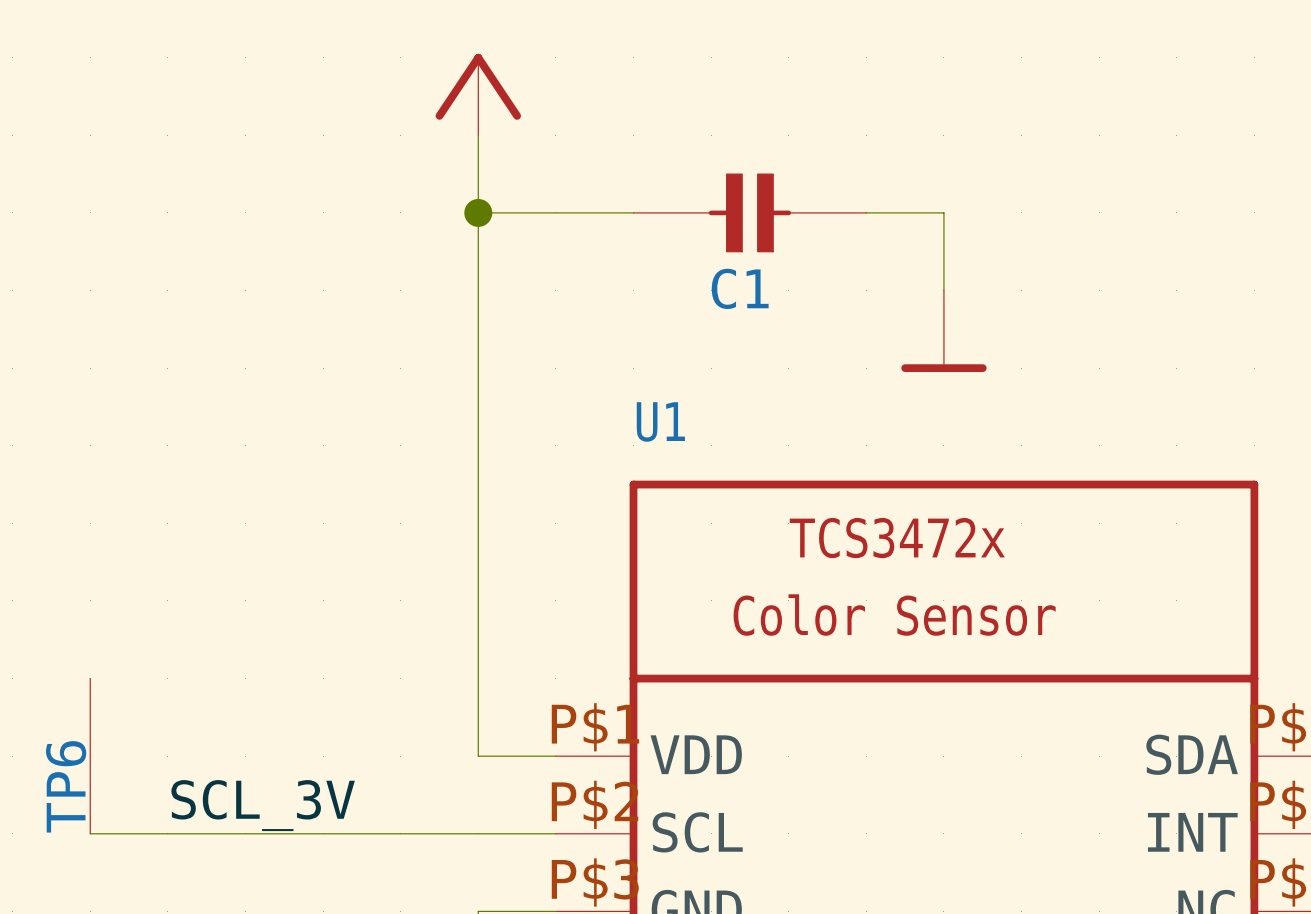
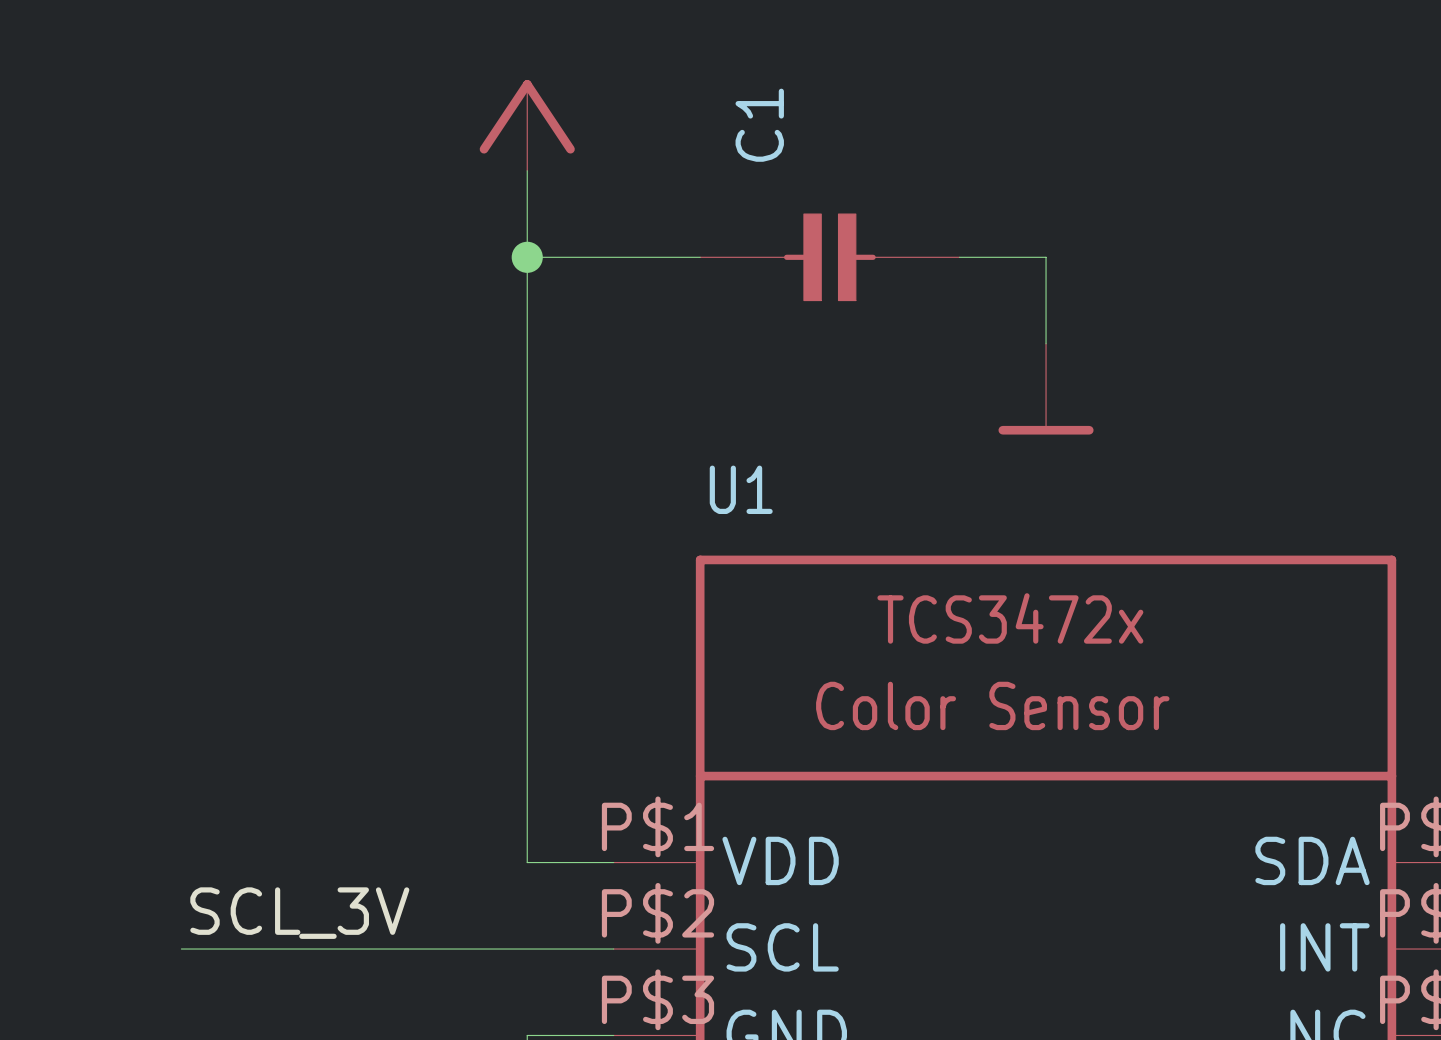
C1 name rotation: 0° (740, 288) -> 90° counterclockwise (759, 125)
C1 name position: C1 (740, 288) -> C1 (759, 125)
TP6: (90, 756) -> none
wire: (90, 833) (167, 833) -> none

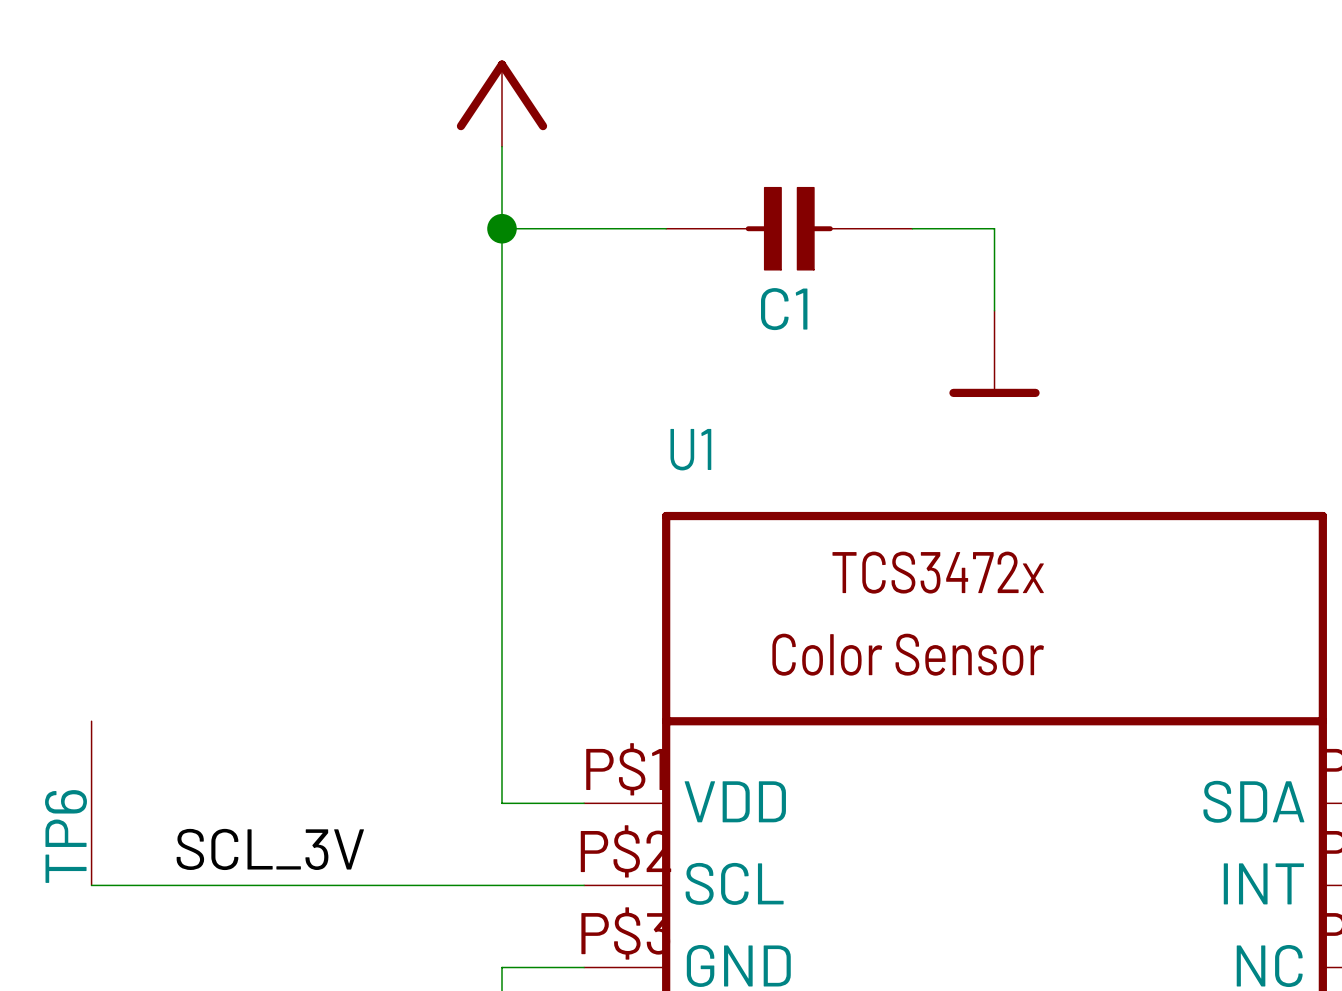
C1 name rotation: 0° (759, 125) -> 90° clockwise (784, 309)
C1 name position: C1 (759, 125) -> C1 (784, 309)
TP6: none -> (91, 803)
wire: none -> (91, 885) (173, 885)

